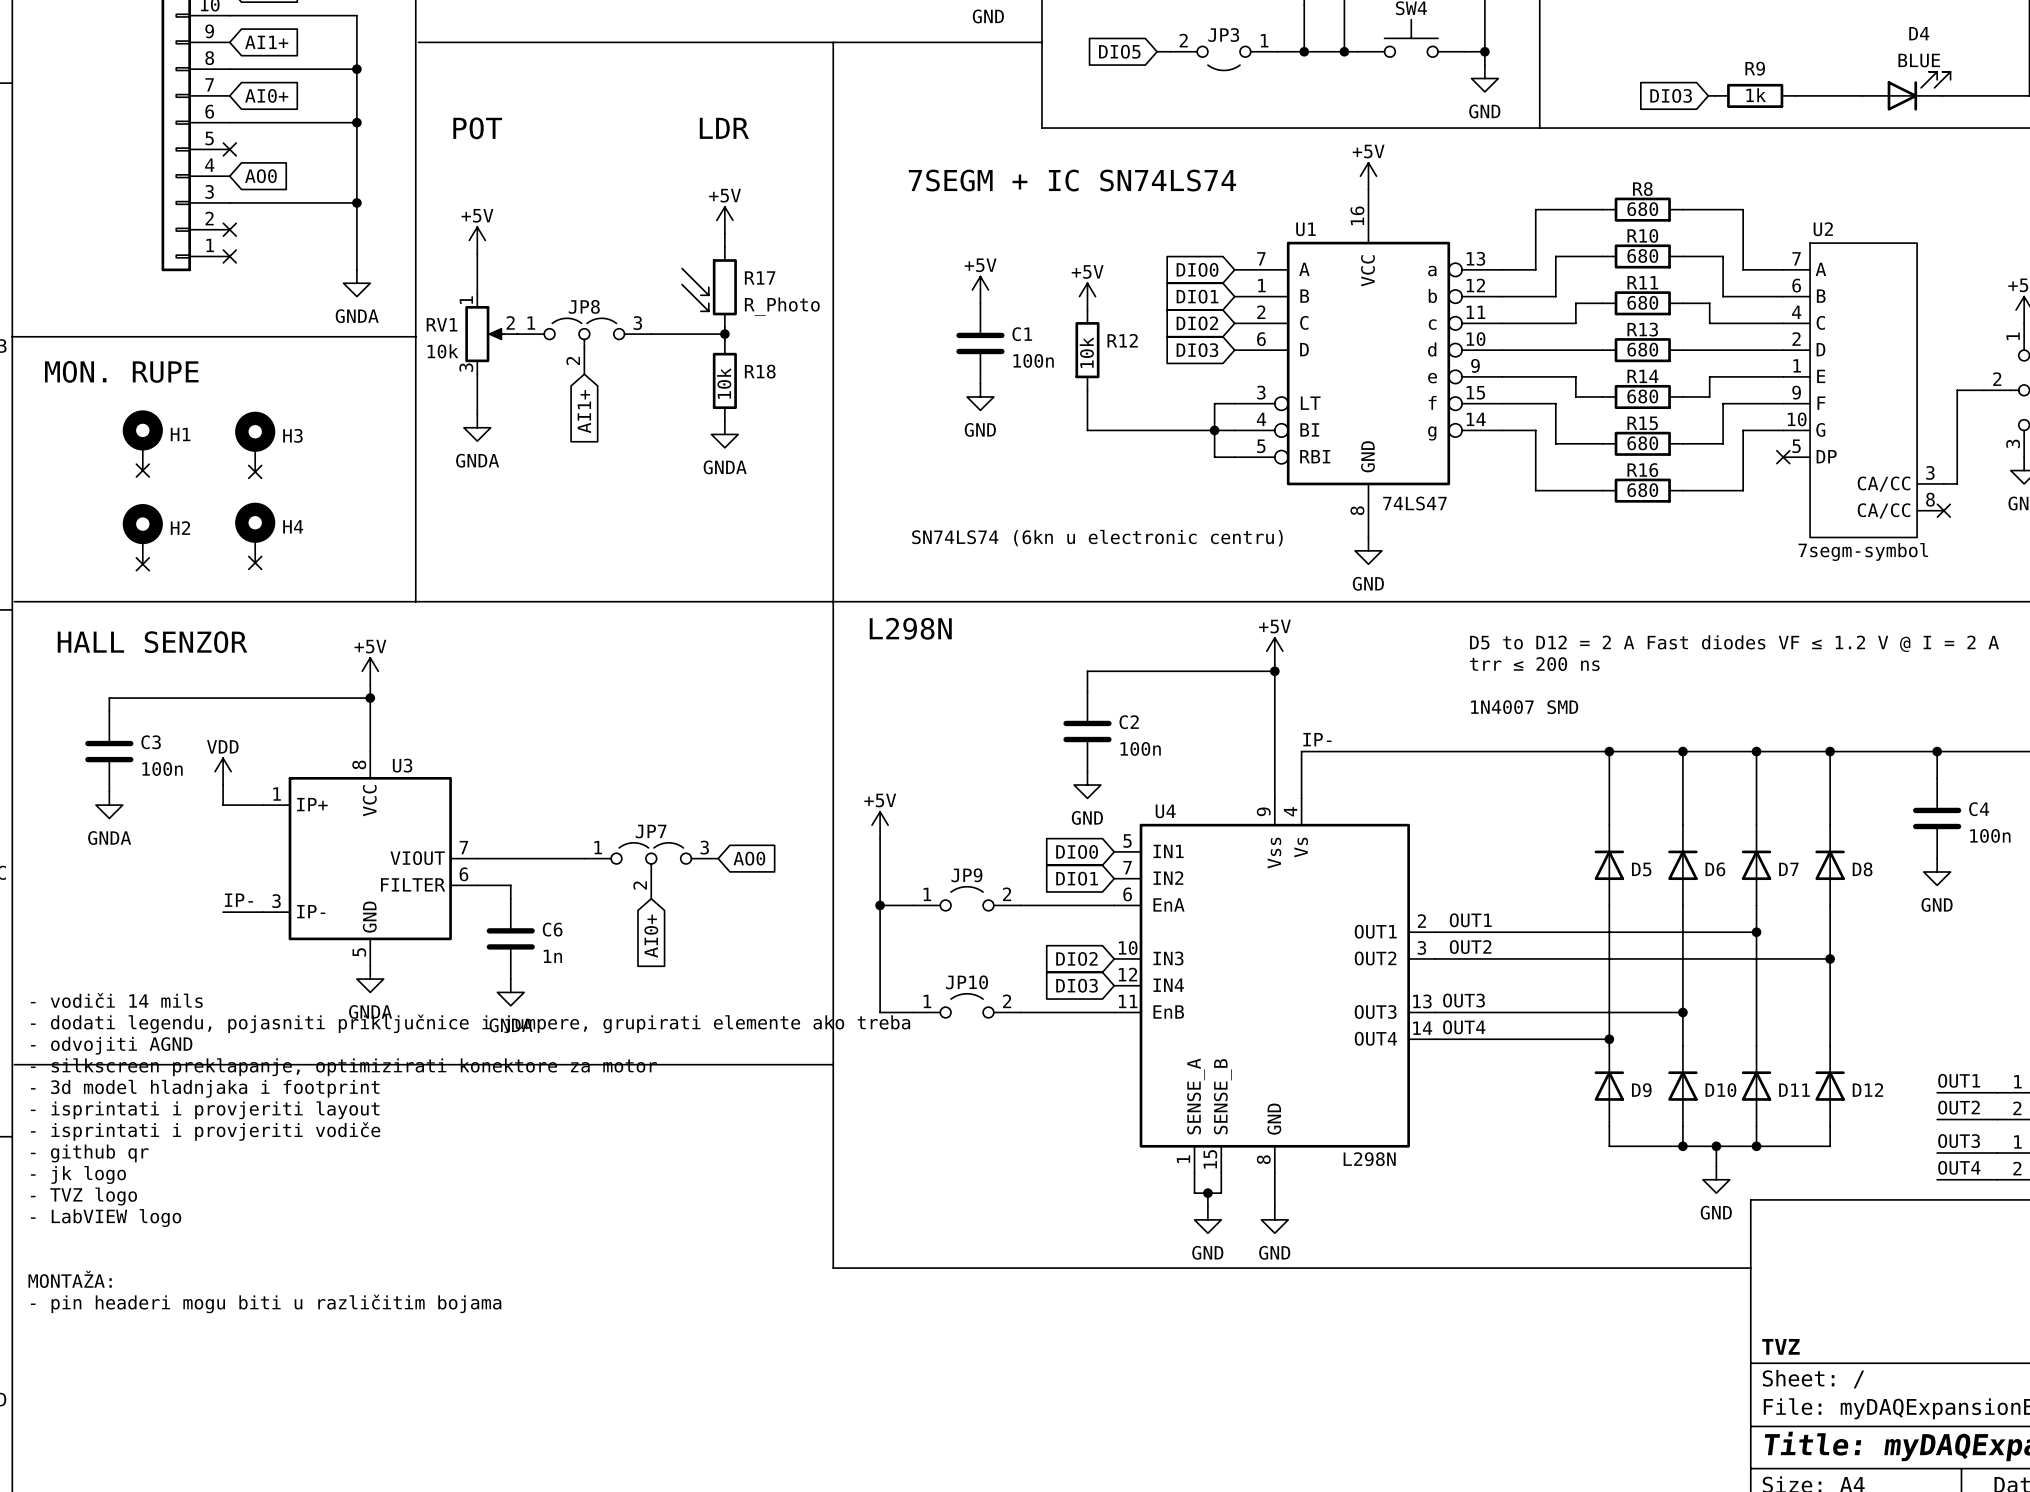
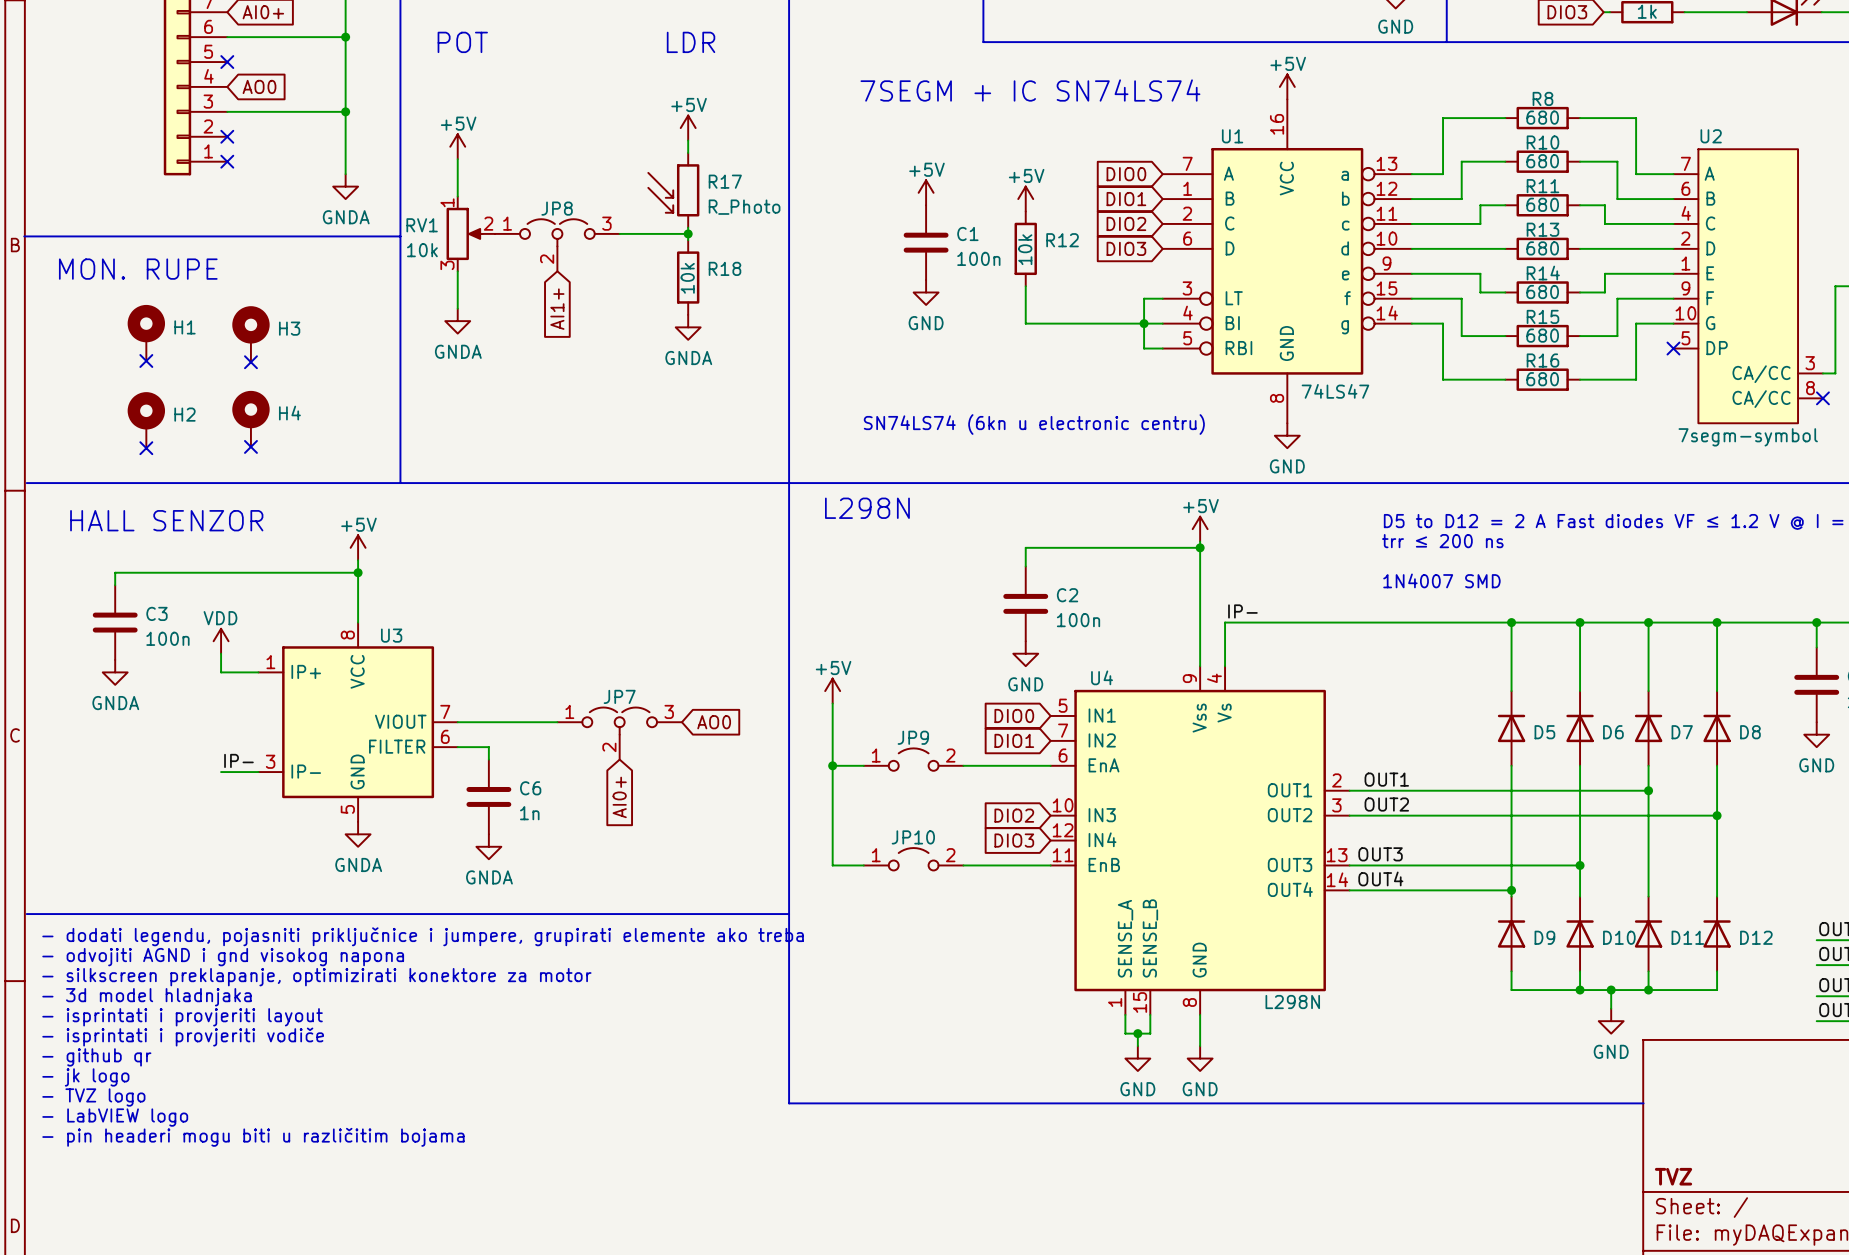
text: - vodiči 14 mils (116, 1000) -> none
text: - dodati legendu, pojasniti priključnice i jumpere, grupirati elemente ako treba (470, 1023) -> none
text: - odvojiti AGND (111, 1045) -> none
text: - silkscreen preklapanje, optimizirati konektore za motor (343, 1067) -> none
text: - 3d model hladnjaka i footprint (205, 1088) -> - dodati legendu, pojasniti priključnice i jumpere, grupirati elemente ako treba (423, 936)
text: - isprintati i provjeriti layout (205, 1110) -> - odvojiti AGND i gnd visokog napona (223, 957)
text: - isprintati i provjeriti vodiče (205, 1131) -> - silkscreen preklapanje, optimizirati konektore za motor (316, 977)
text: - github qr (89, 1153) -> - 3d model hladnjaka (146, 997)
text: - jk logo (78, 1174) -> - isprintati i provjeriti layout (182, 1017)
text: - TVZ logo (83, 1196) -> - isprintati i provjeriti vodiče (183, 1037)
text: - LabVIEW logo (106, 1218) -> - github qr (96, 1057)
text: none -> - jk logo (85, 1077)
text: none -> - TVZ logo (93, 1097)
text: MONTAŽA: (70, 1279) -> - LabVIEW logo (115, 1117)

